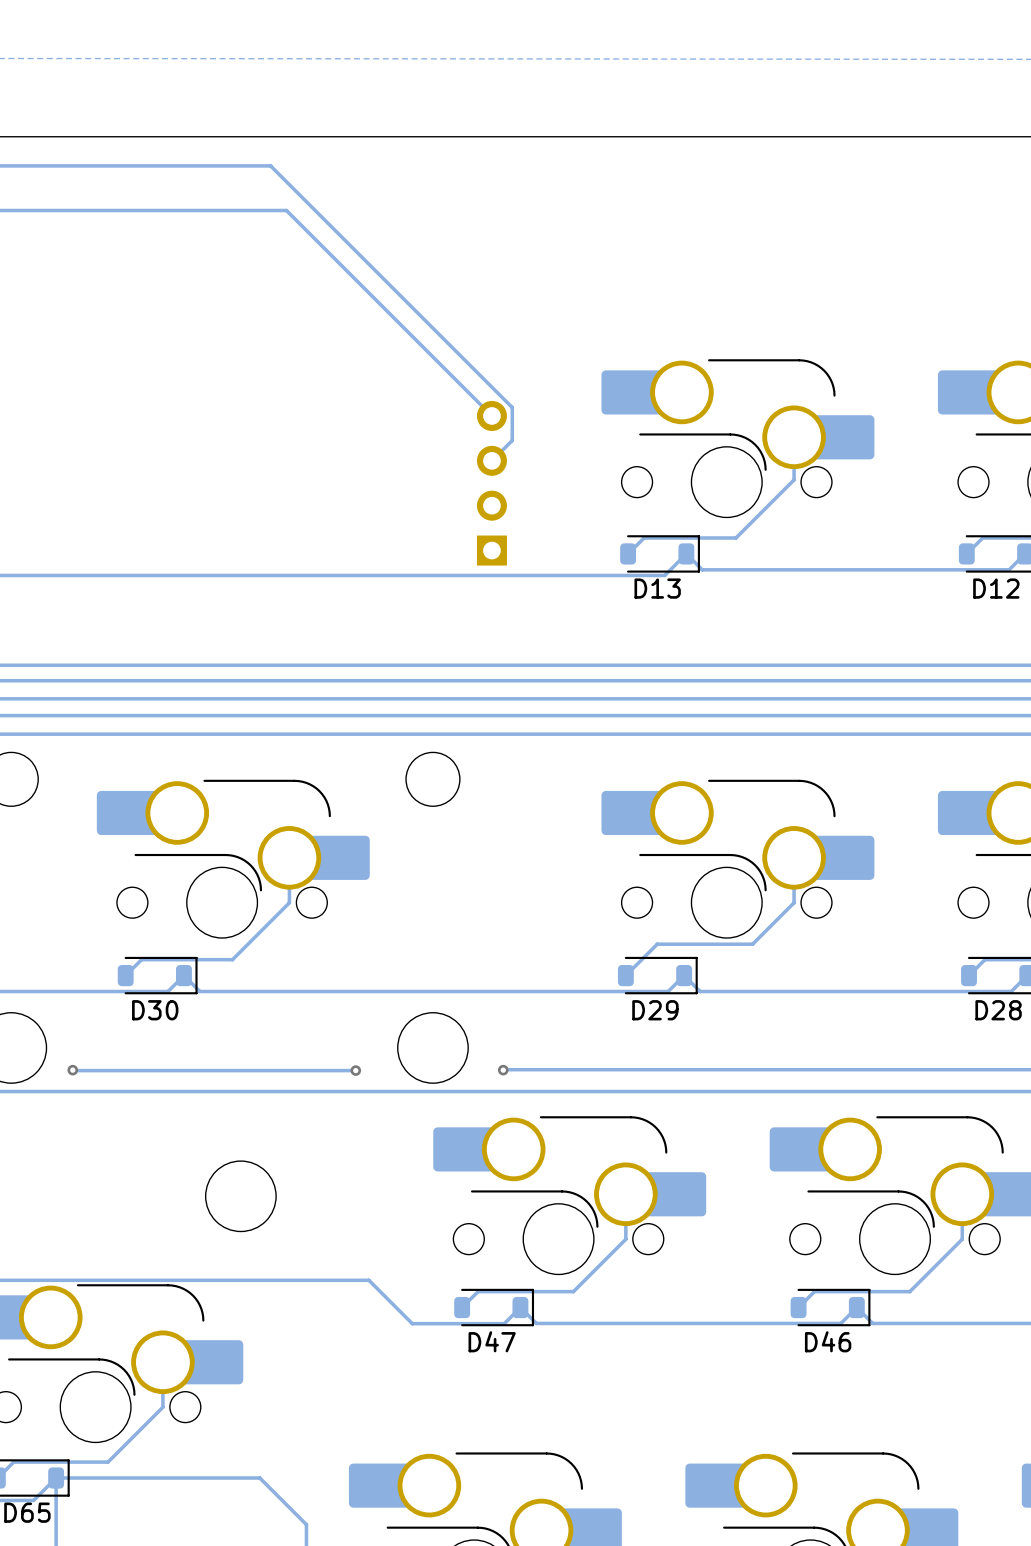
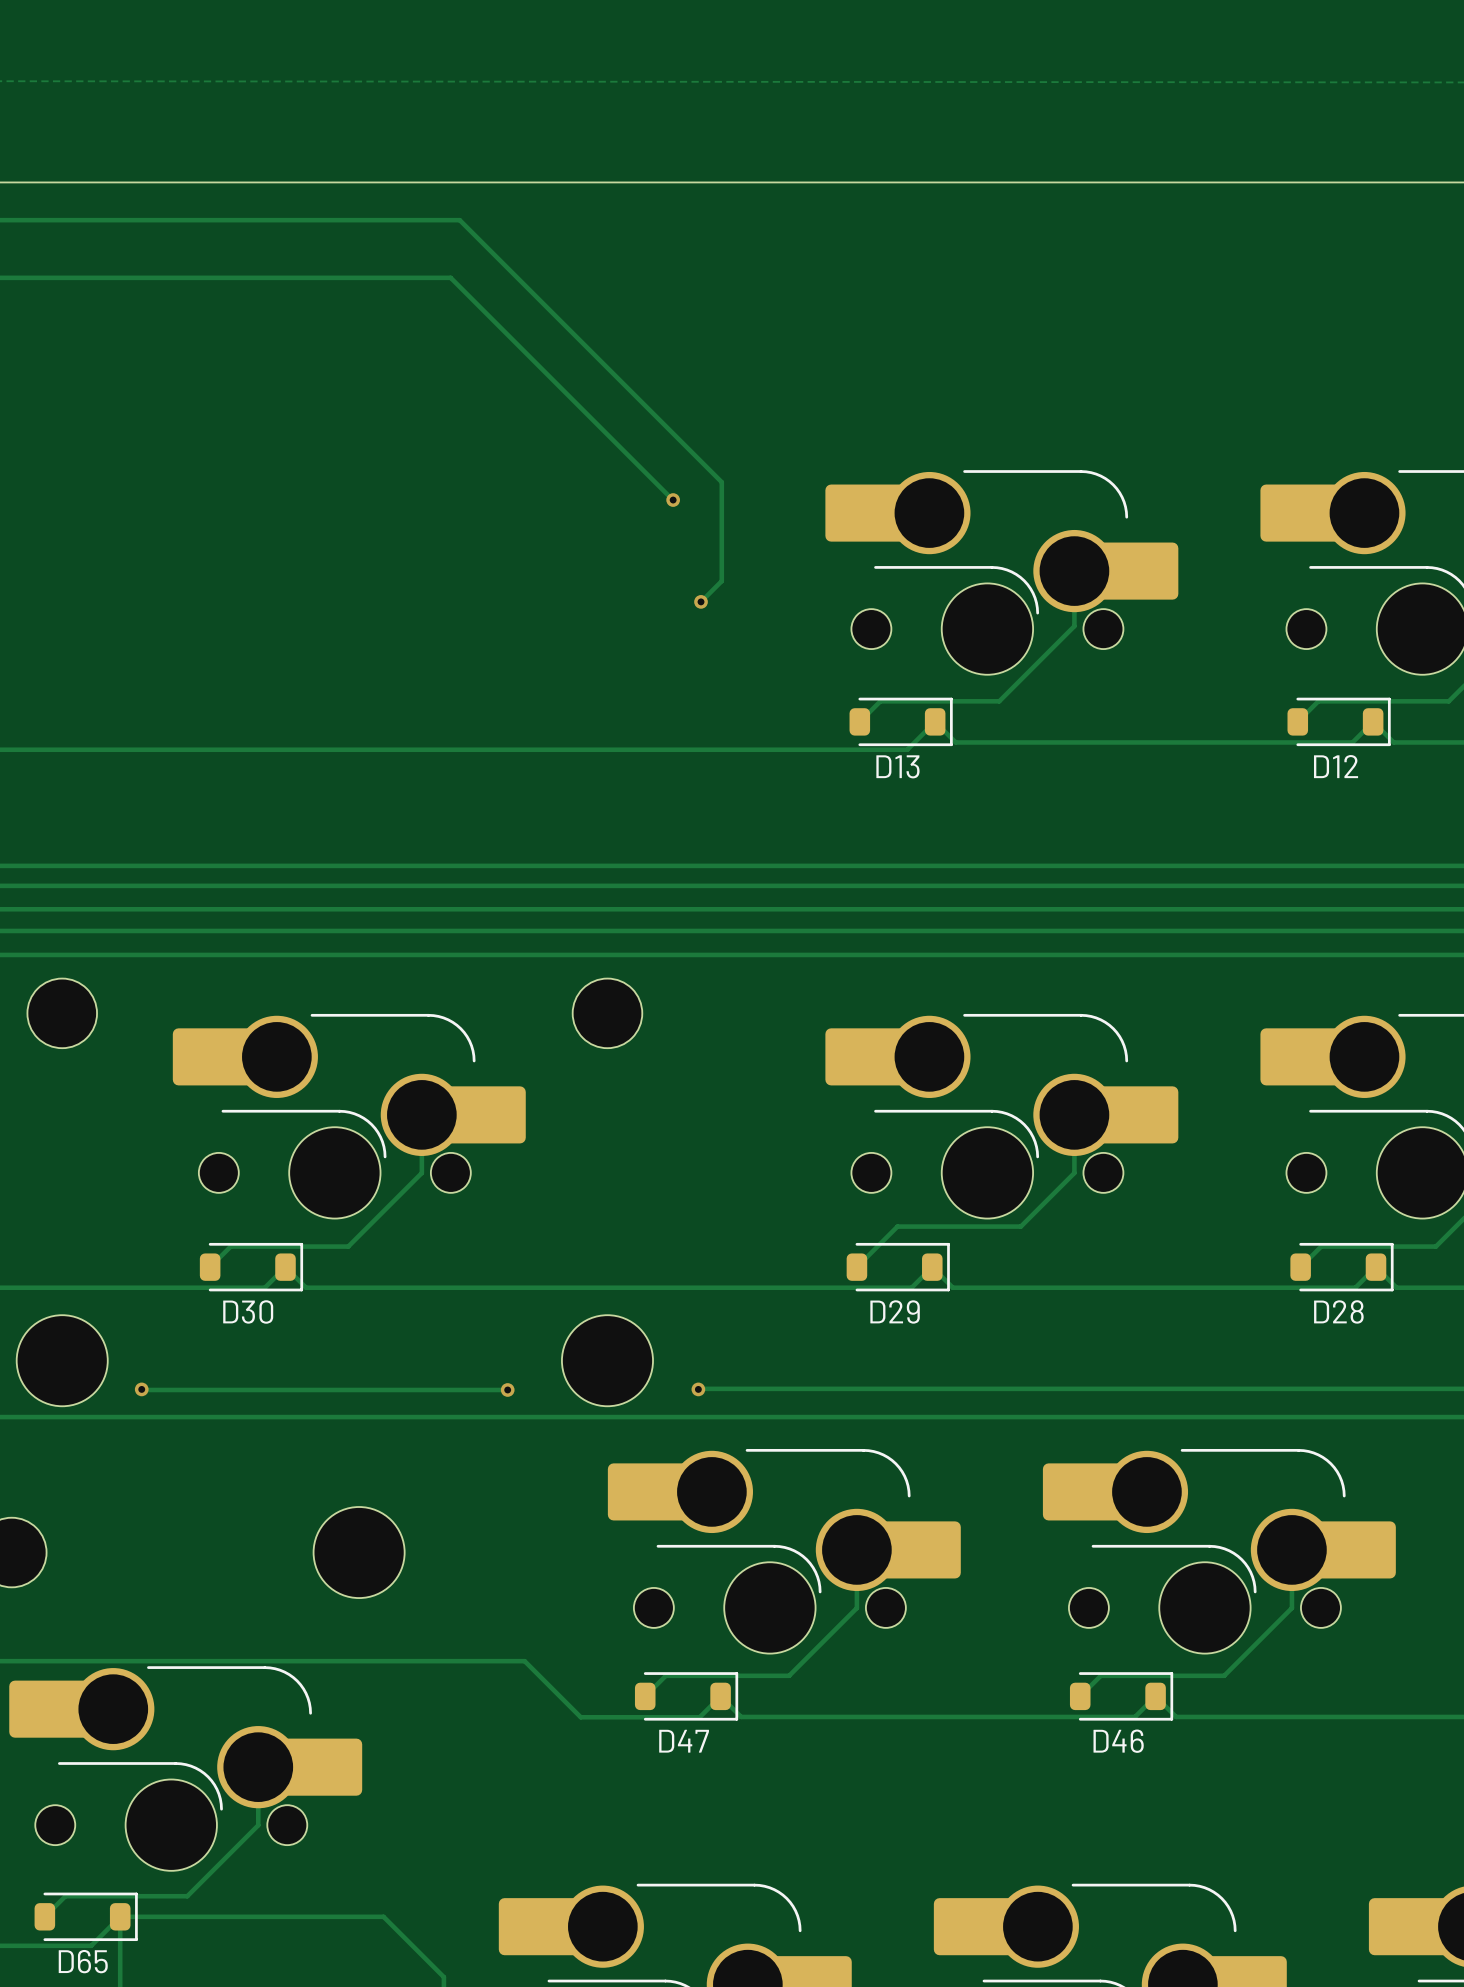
track: (270, 165) (512, 407) (512, 440) (491, 460) -> (397, 220) (459, 220) (721, 482) (721, 581) (701, 601)
track: (286, 210) (491, 415) -> (418, 277) (450, 277) (672, 500)
via: none -> (673, 500)
via: none -> (701, 601)
part: (491, 483) -> none

